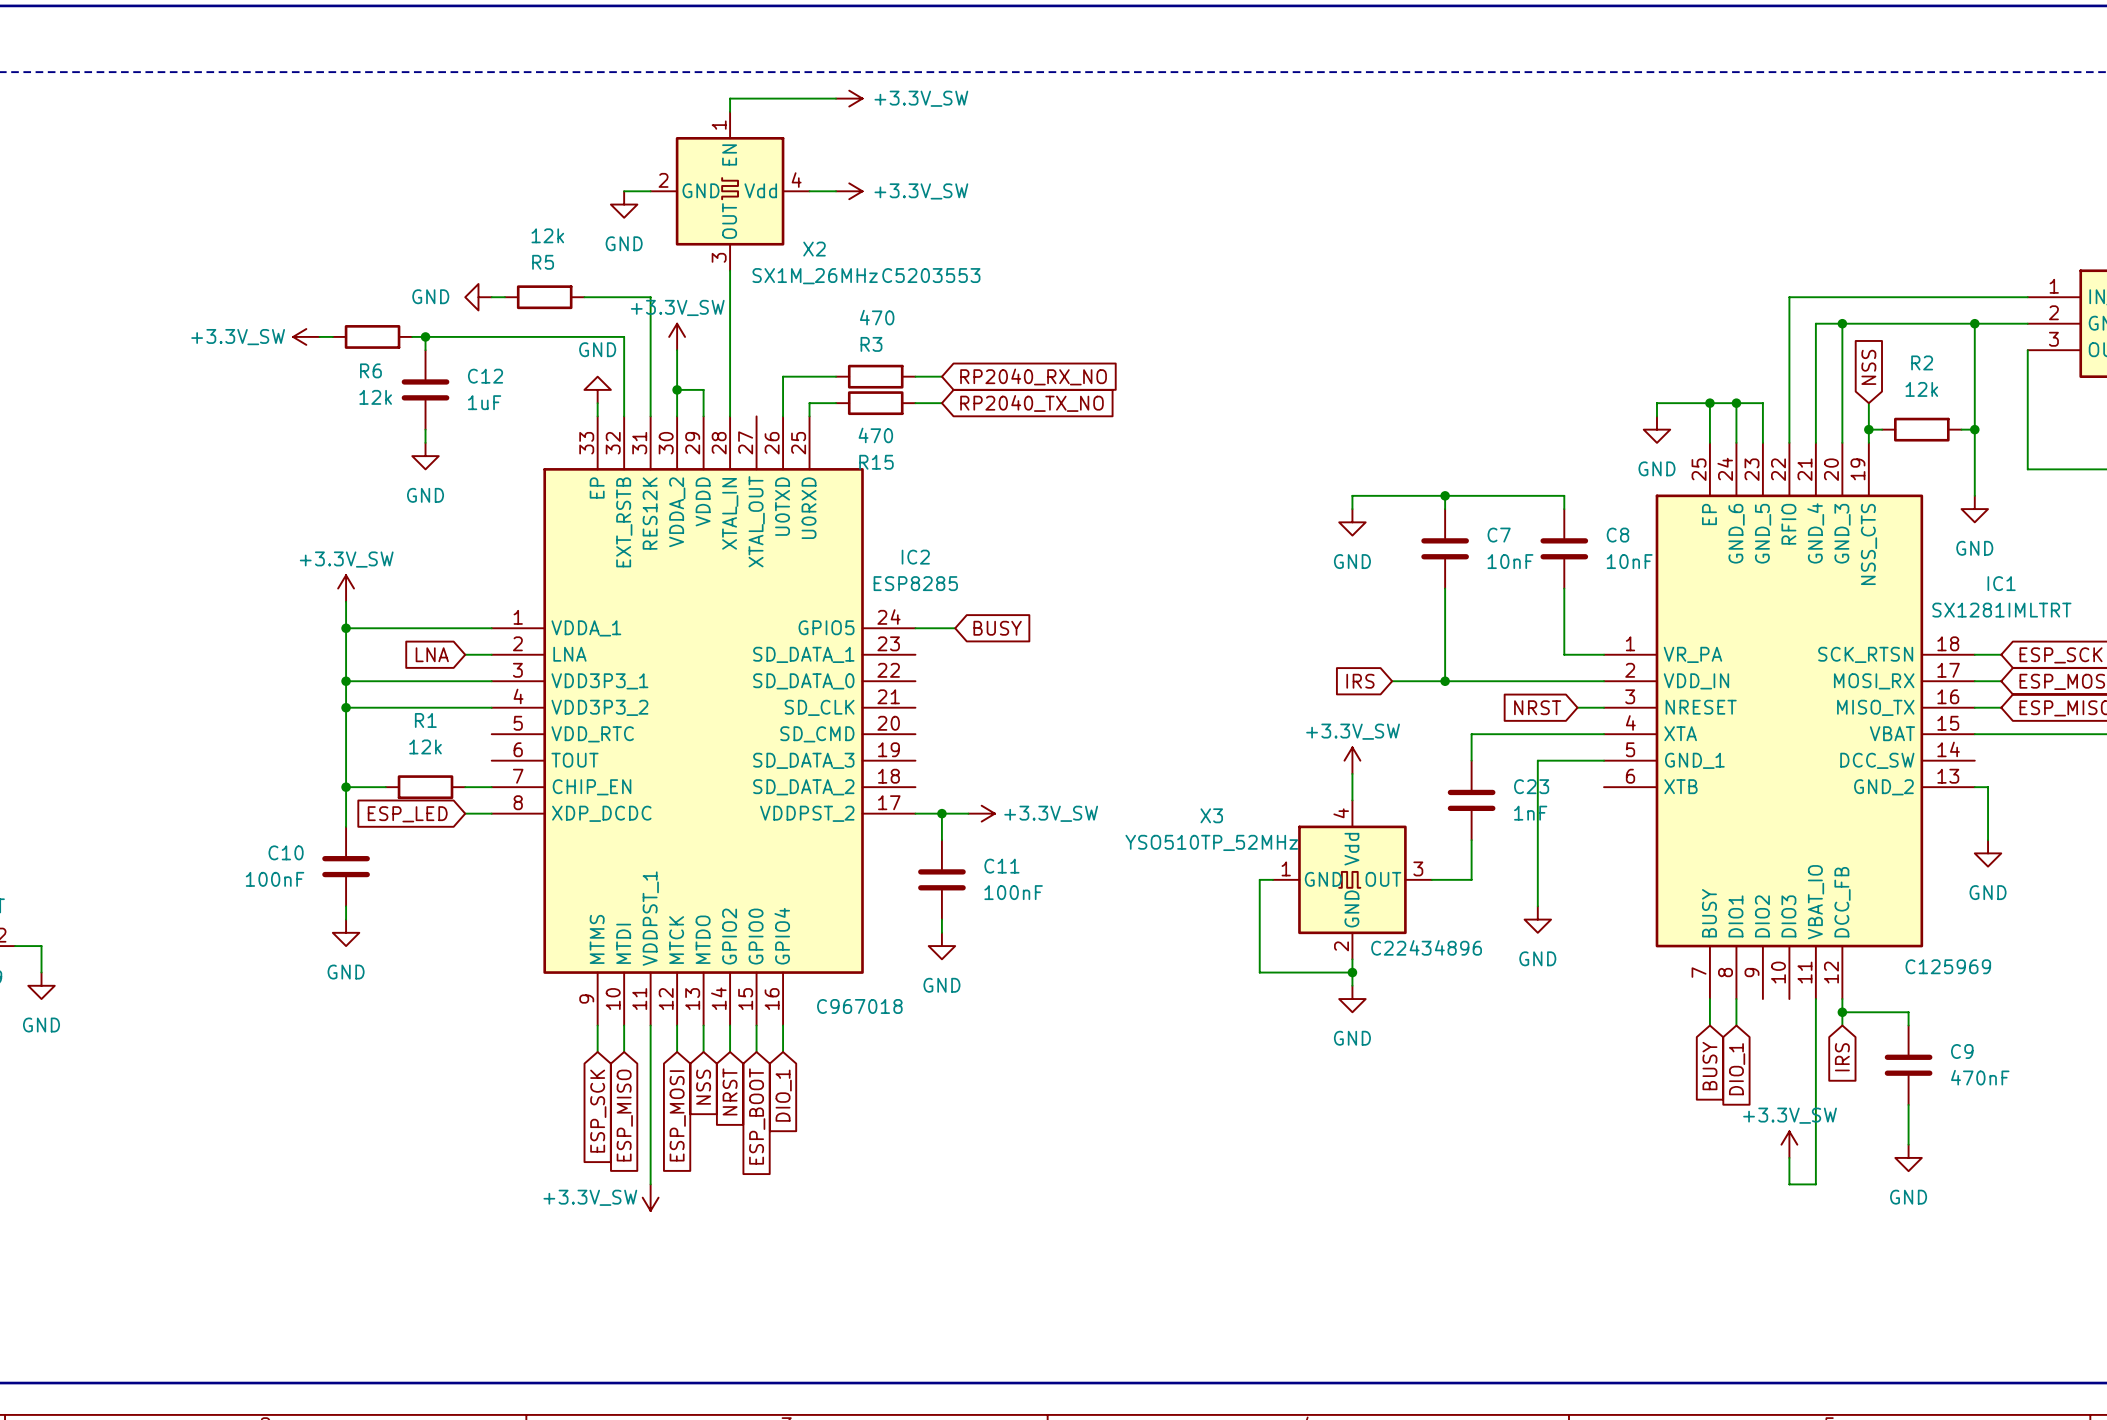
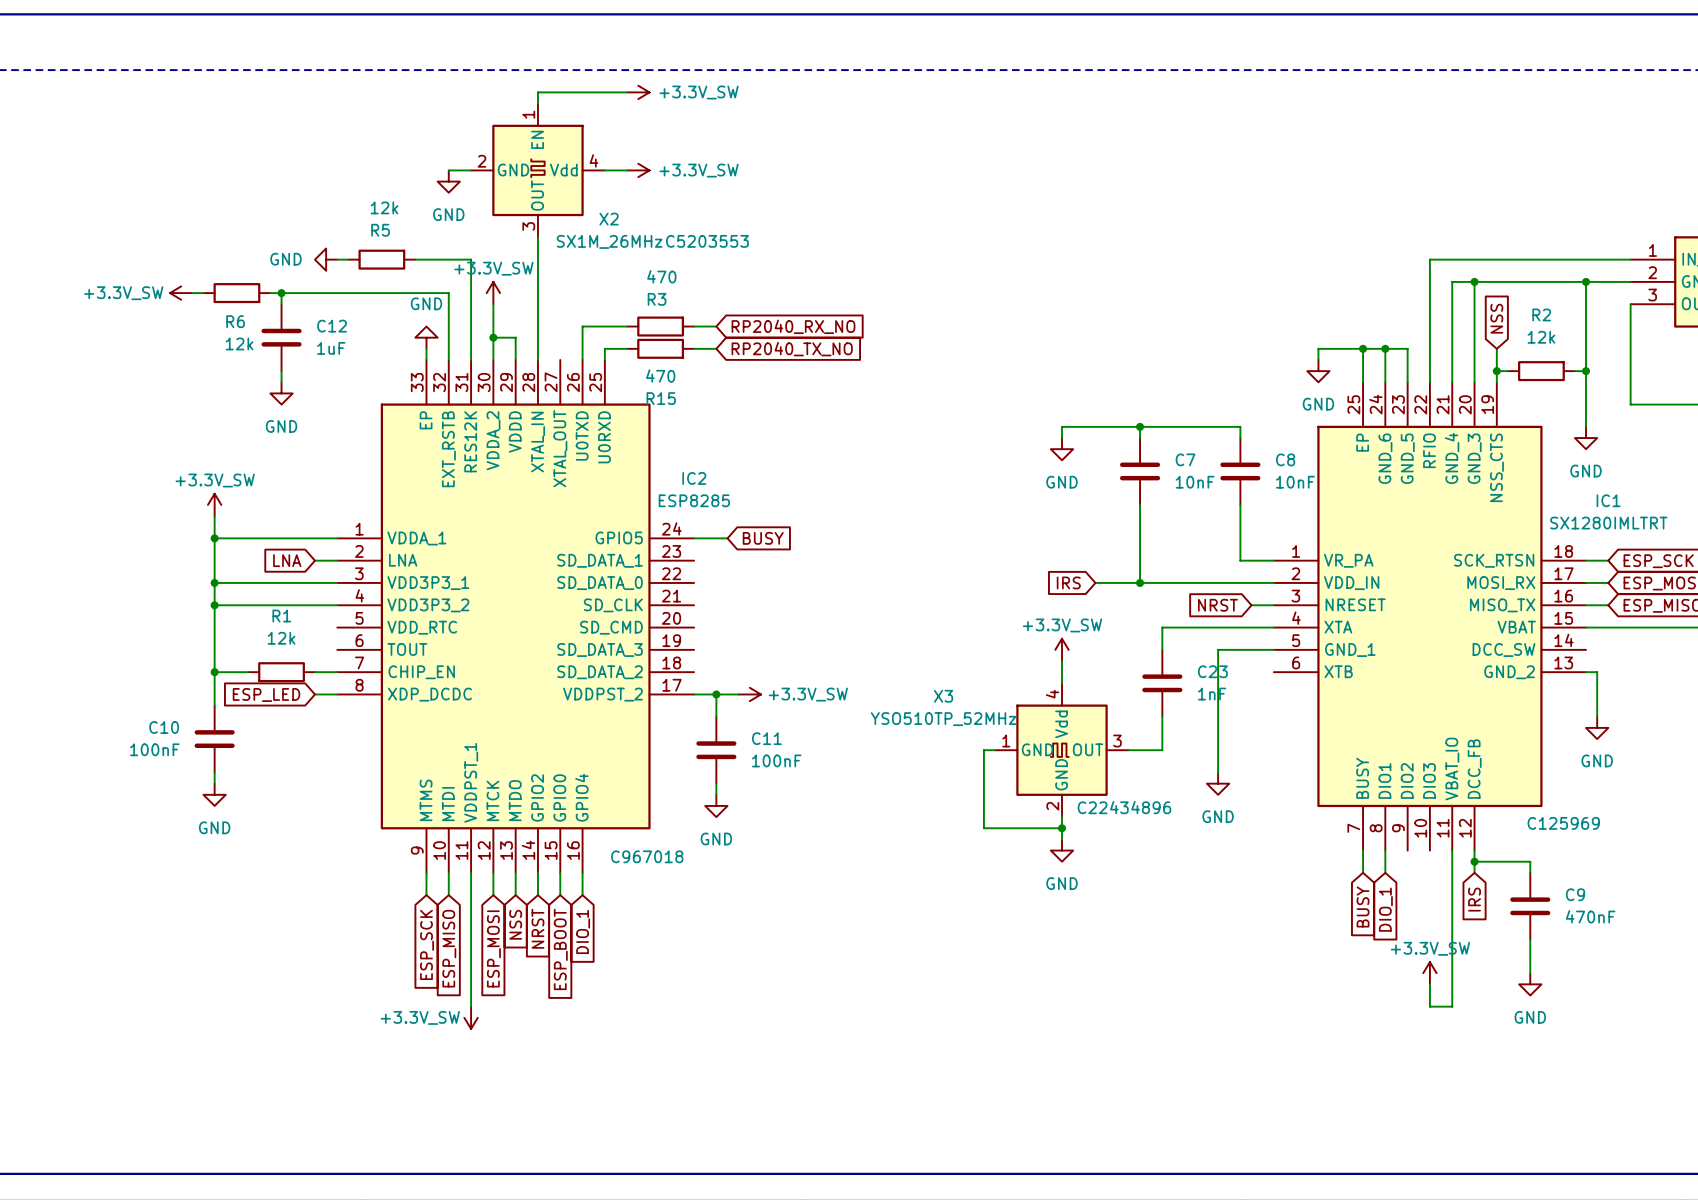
IC1 value: SX1281IMLTRT (2001, 610) -> SX1280IMLTRT (1608, 523)

